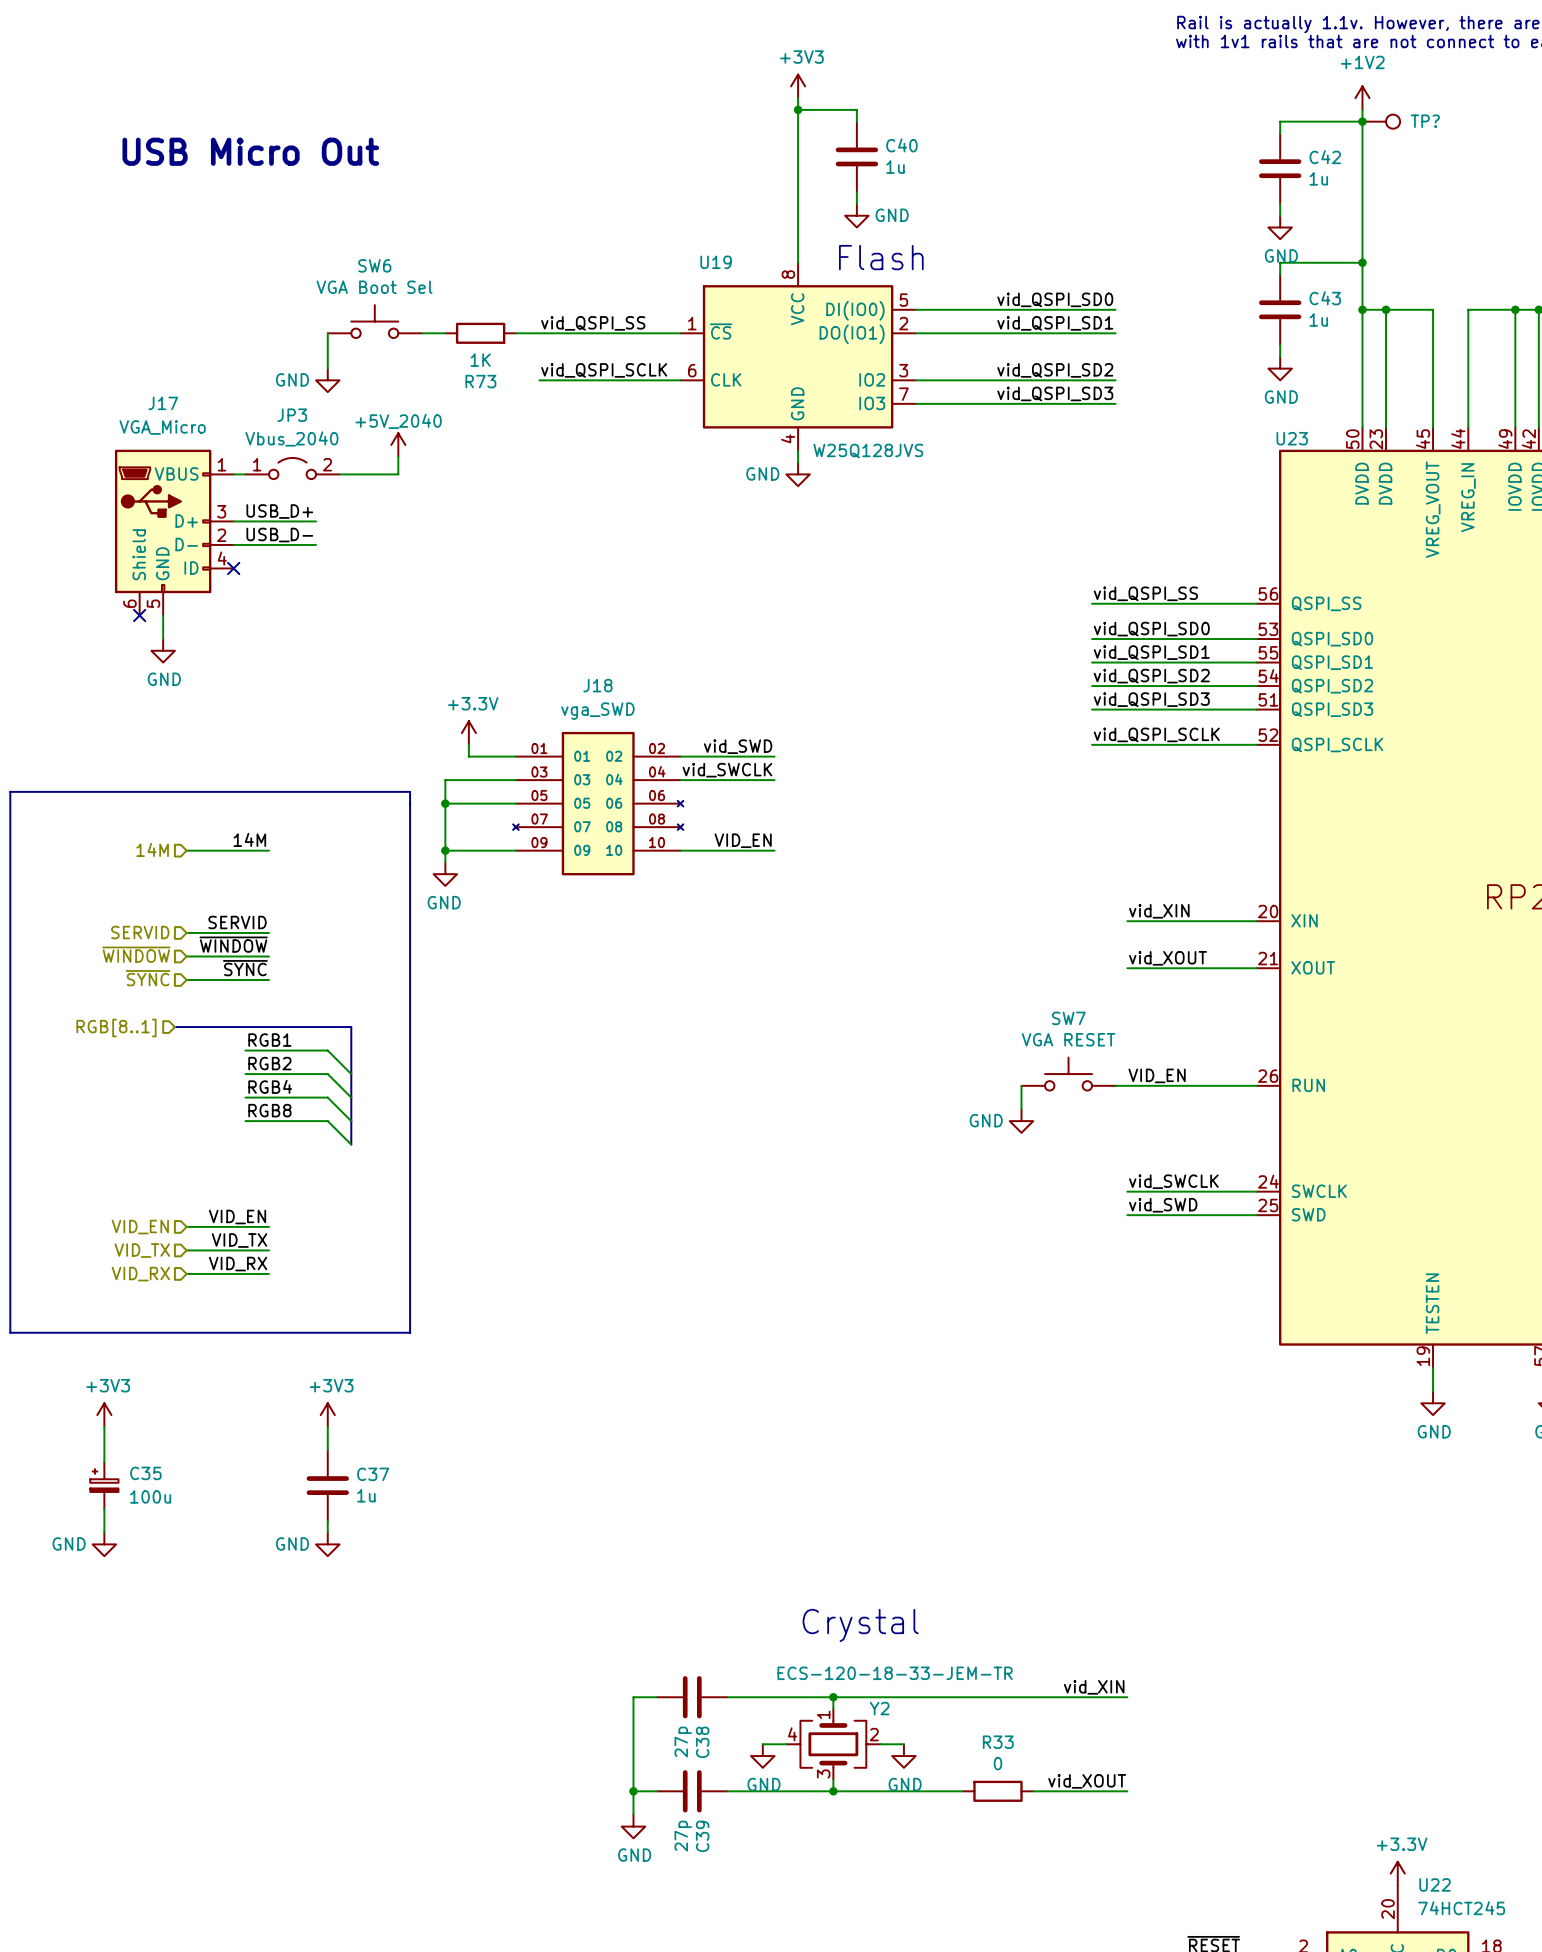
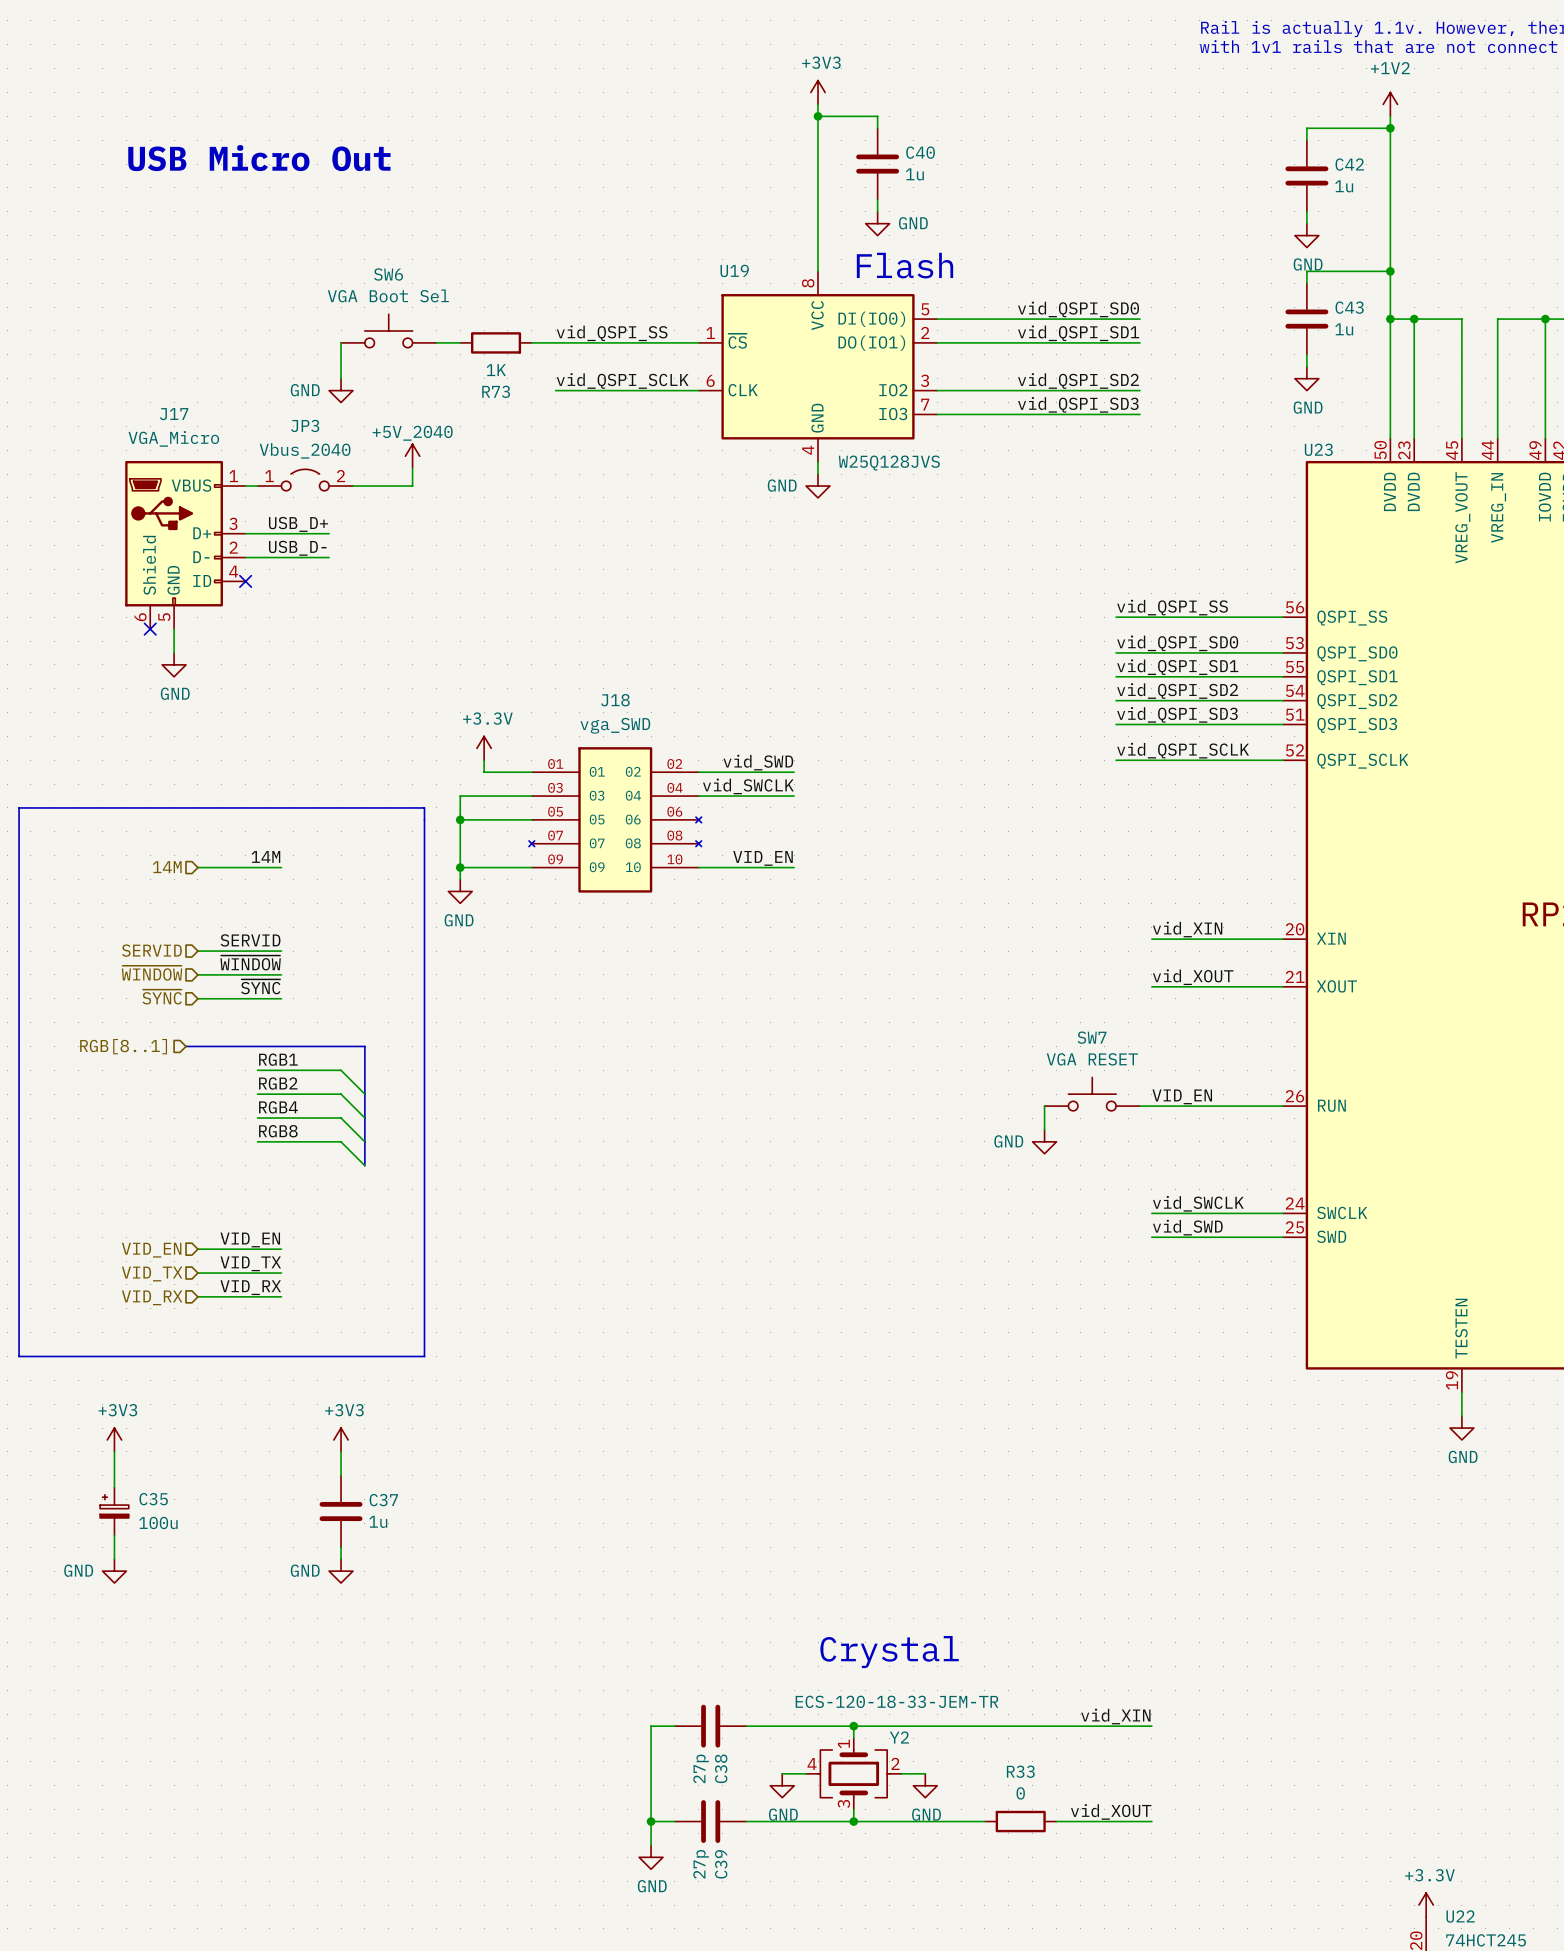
TP?: (1381, 121) -> none

